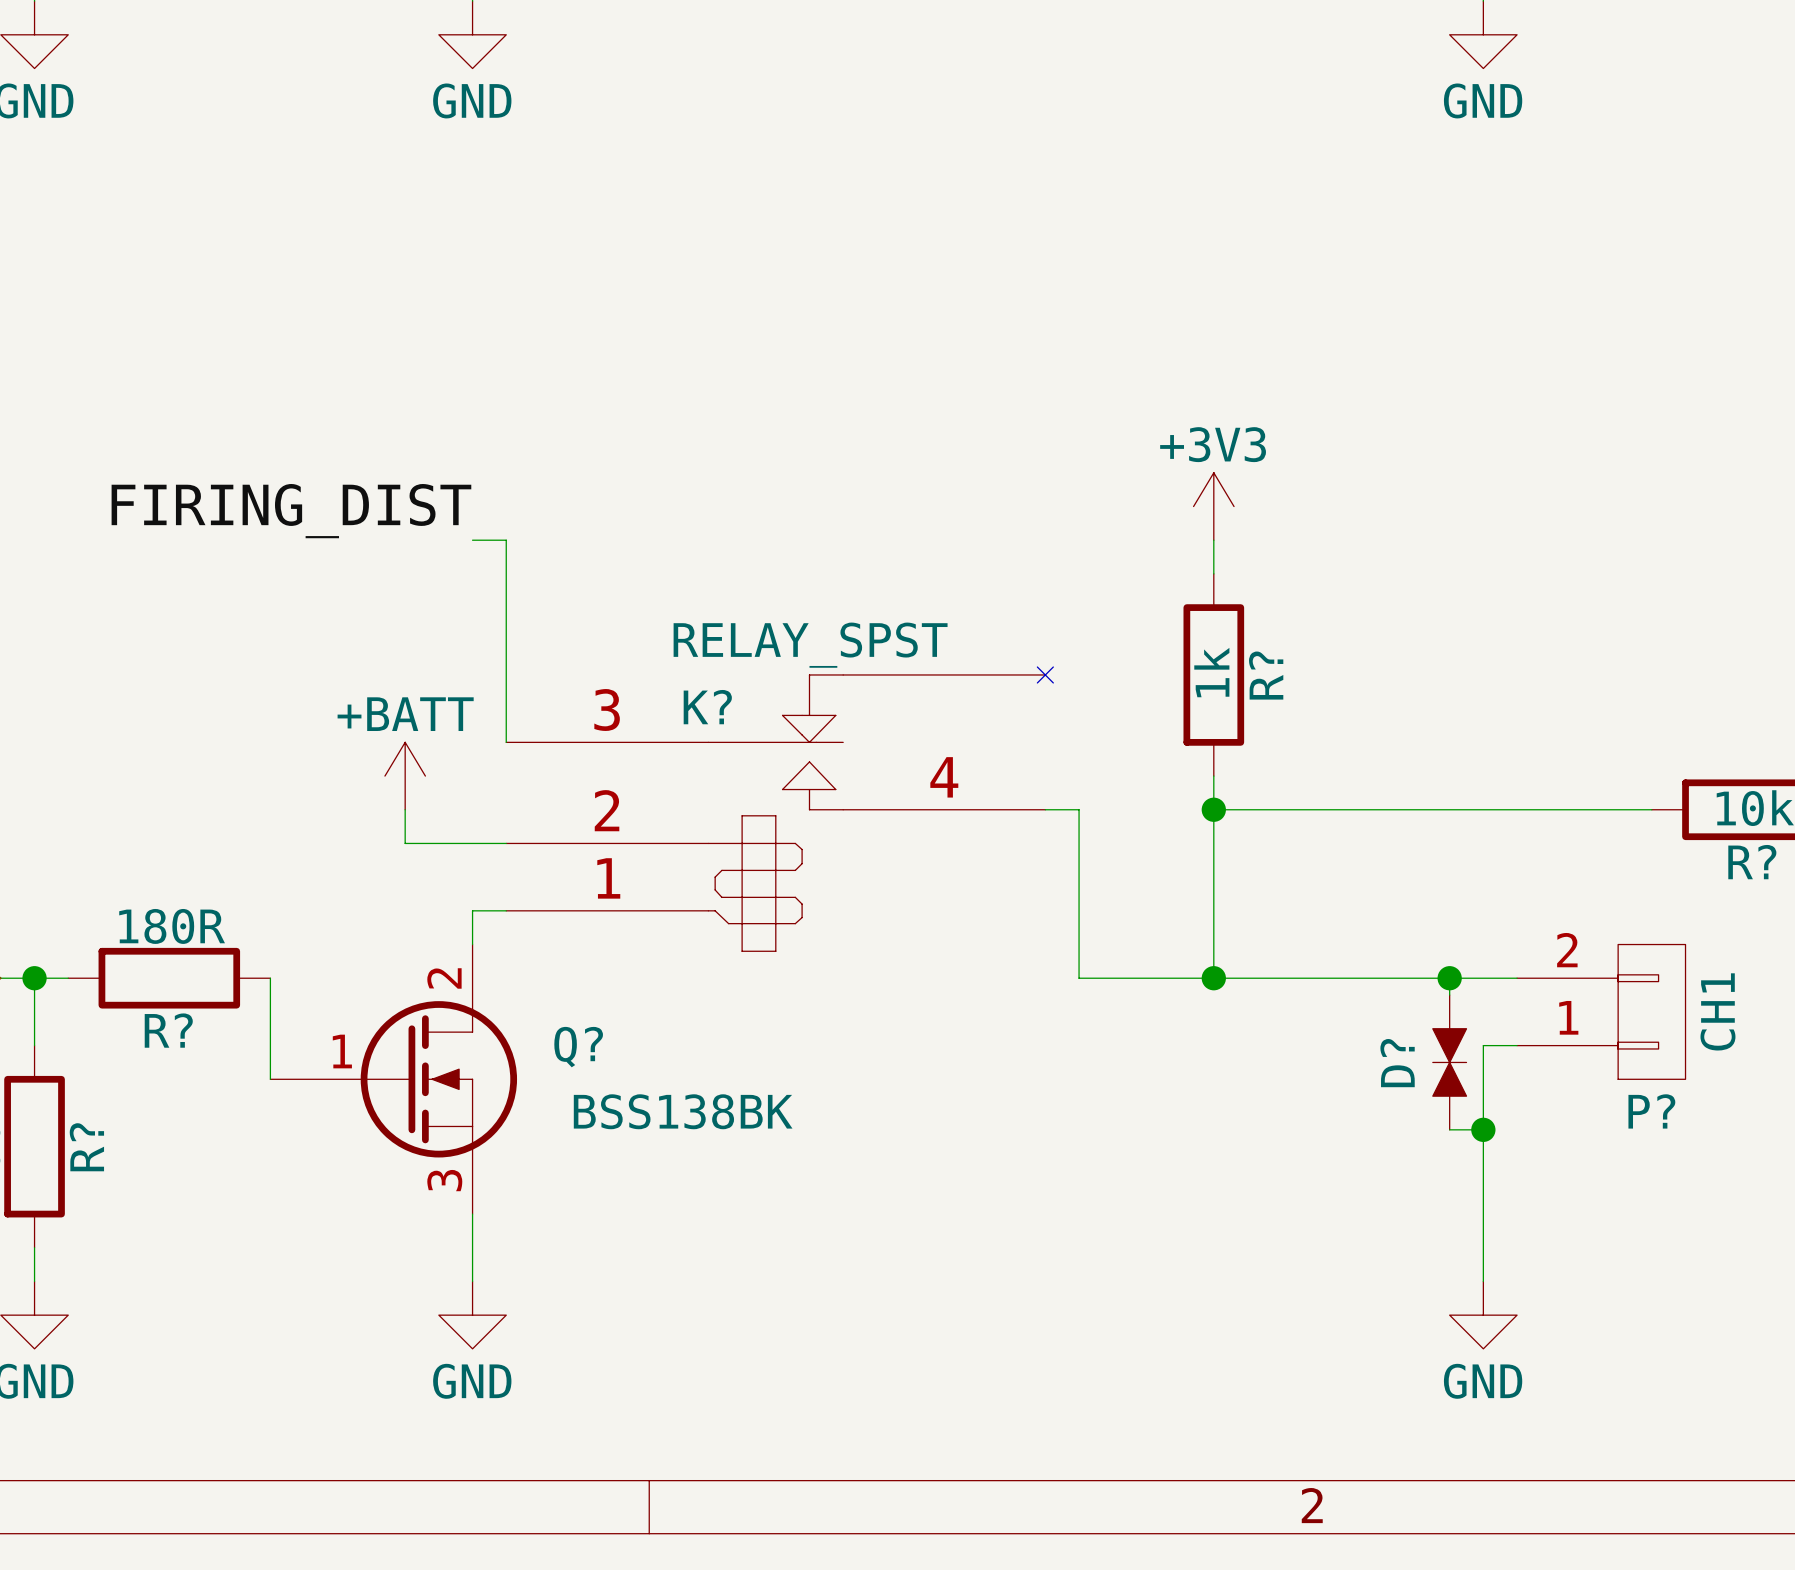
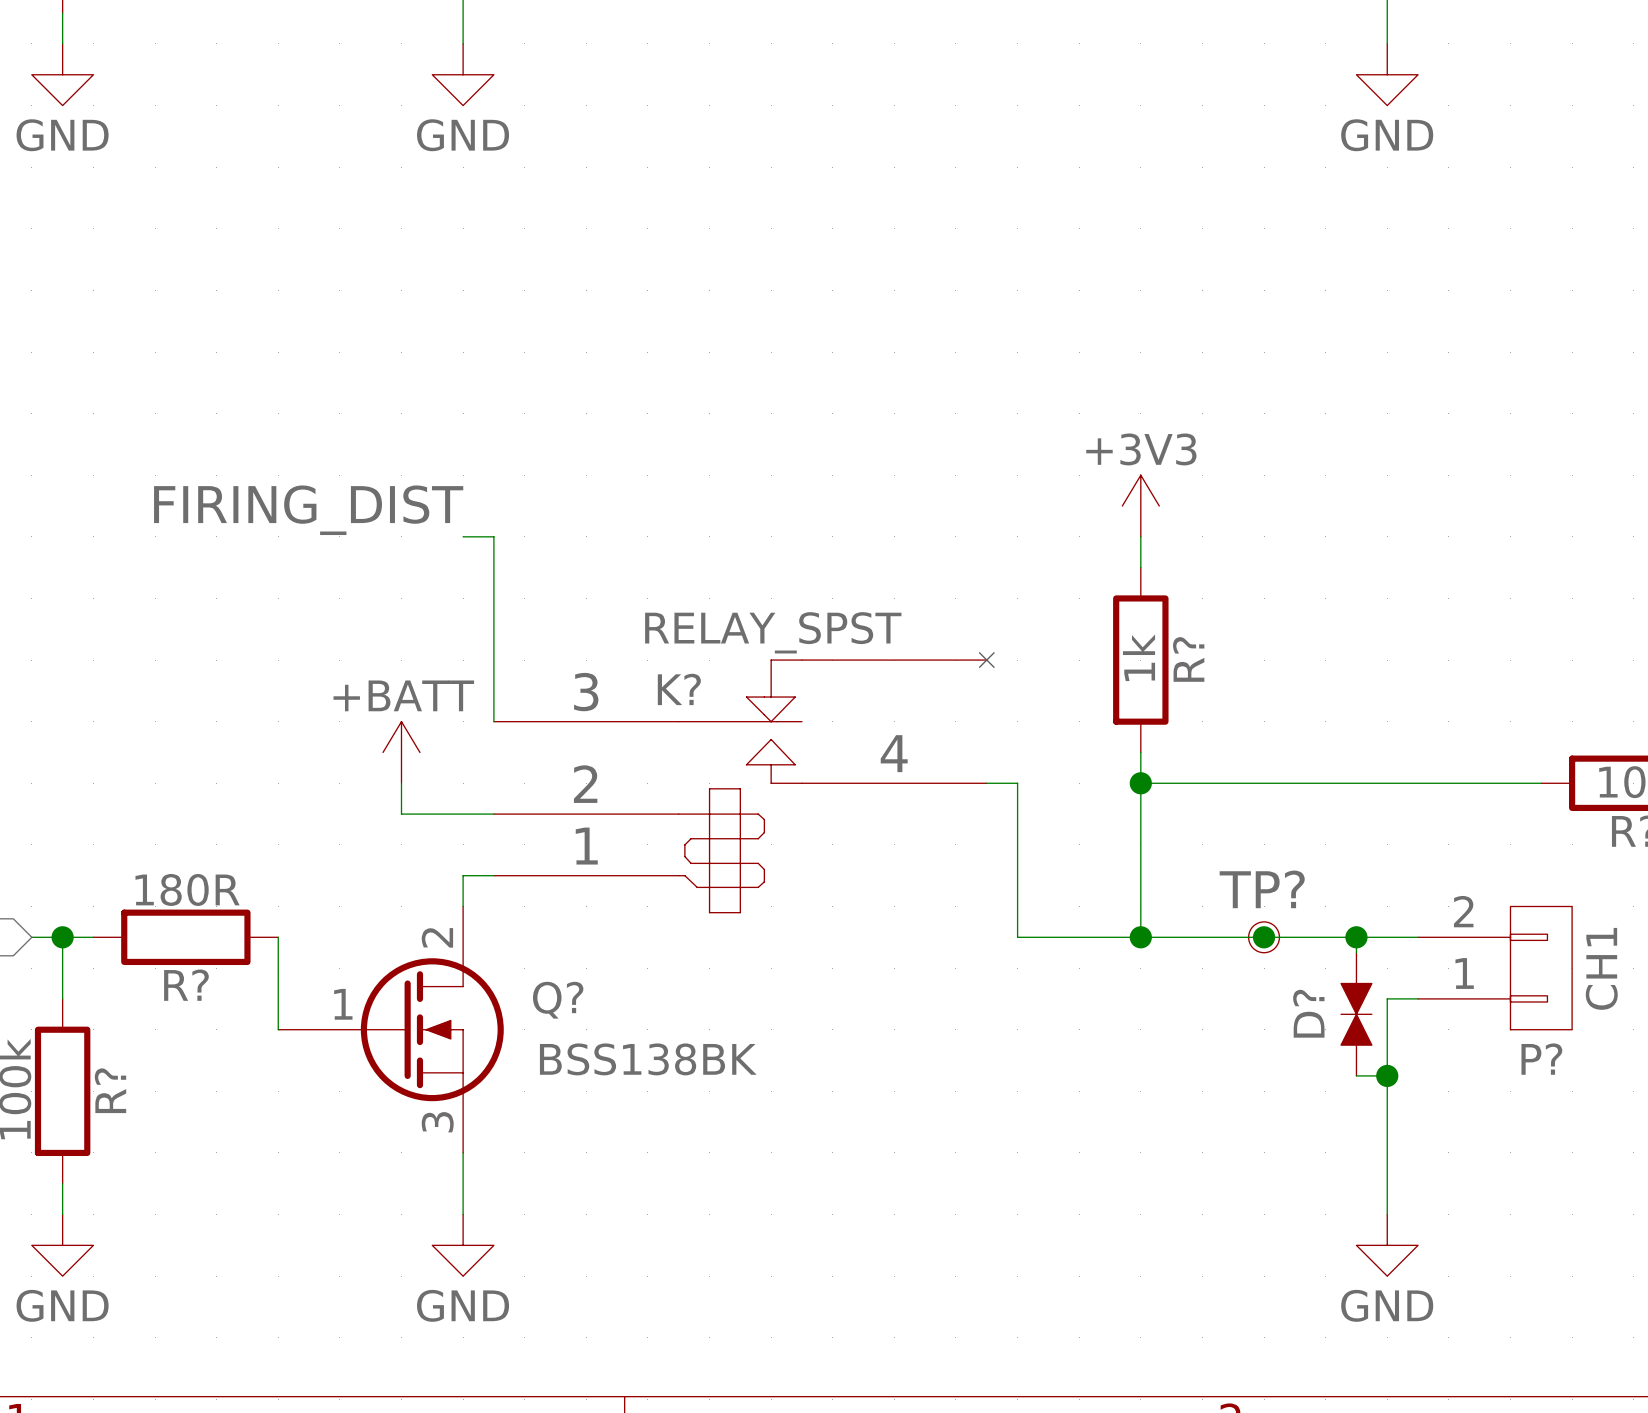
TP?: none -> (1264, 937)
junction: none -> (1264, 937)

